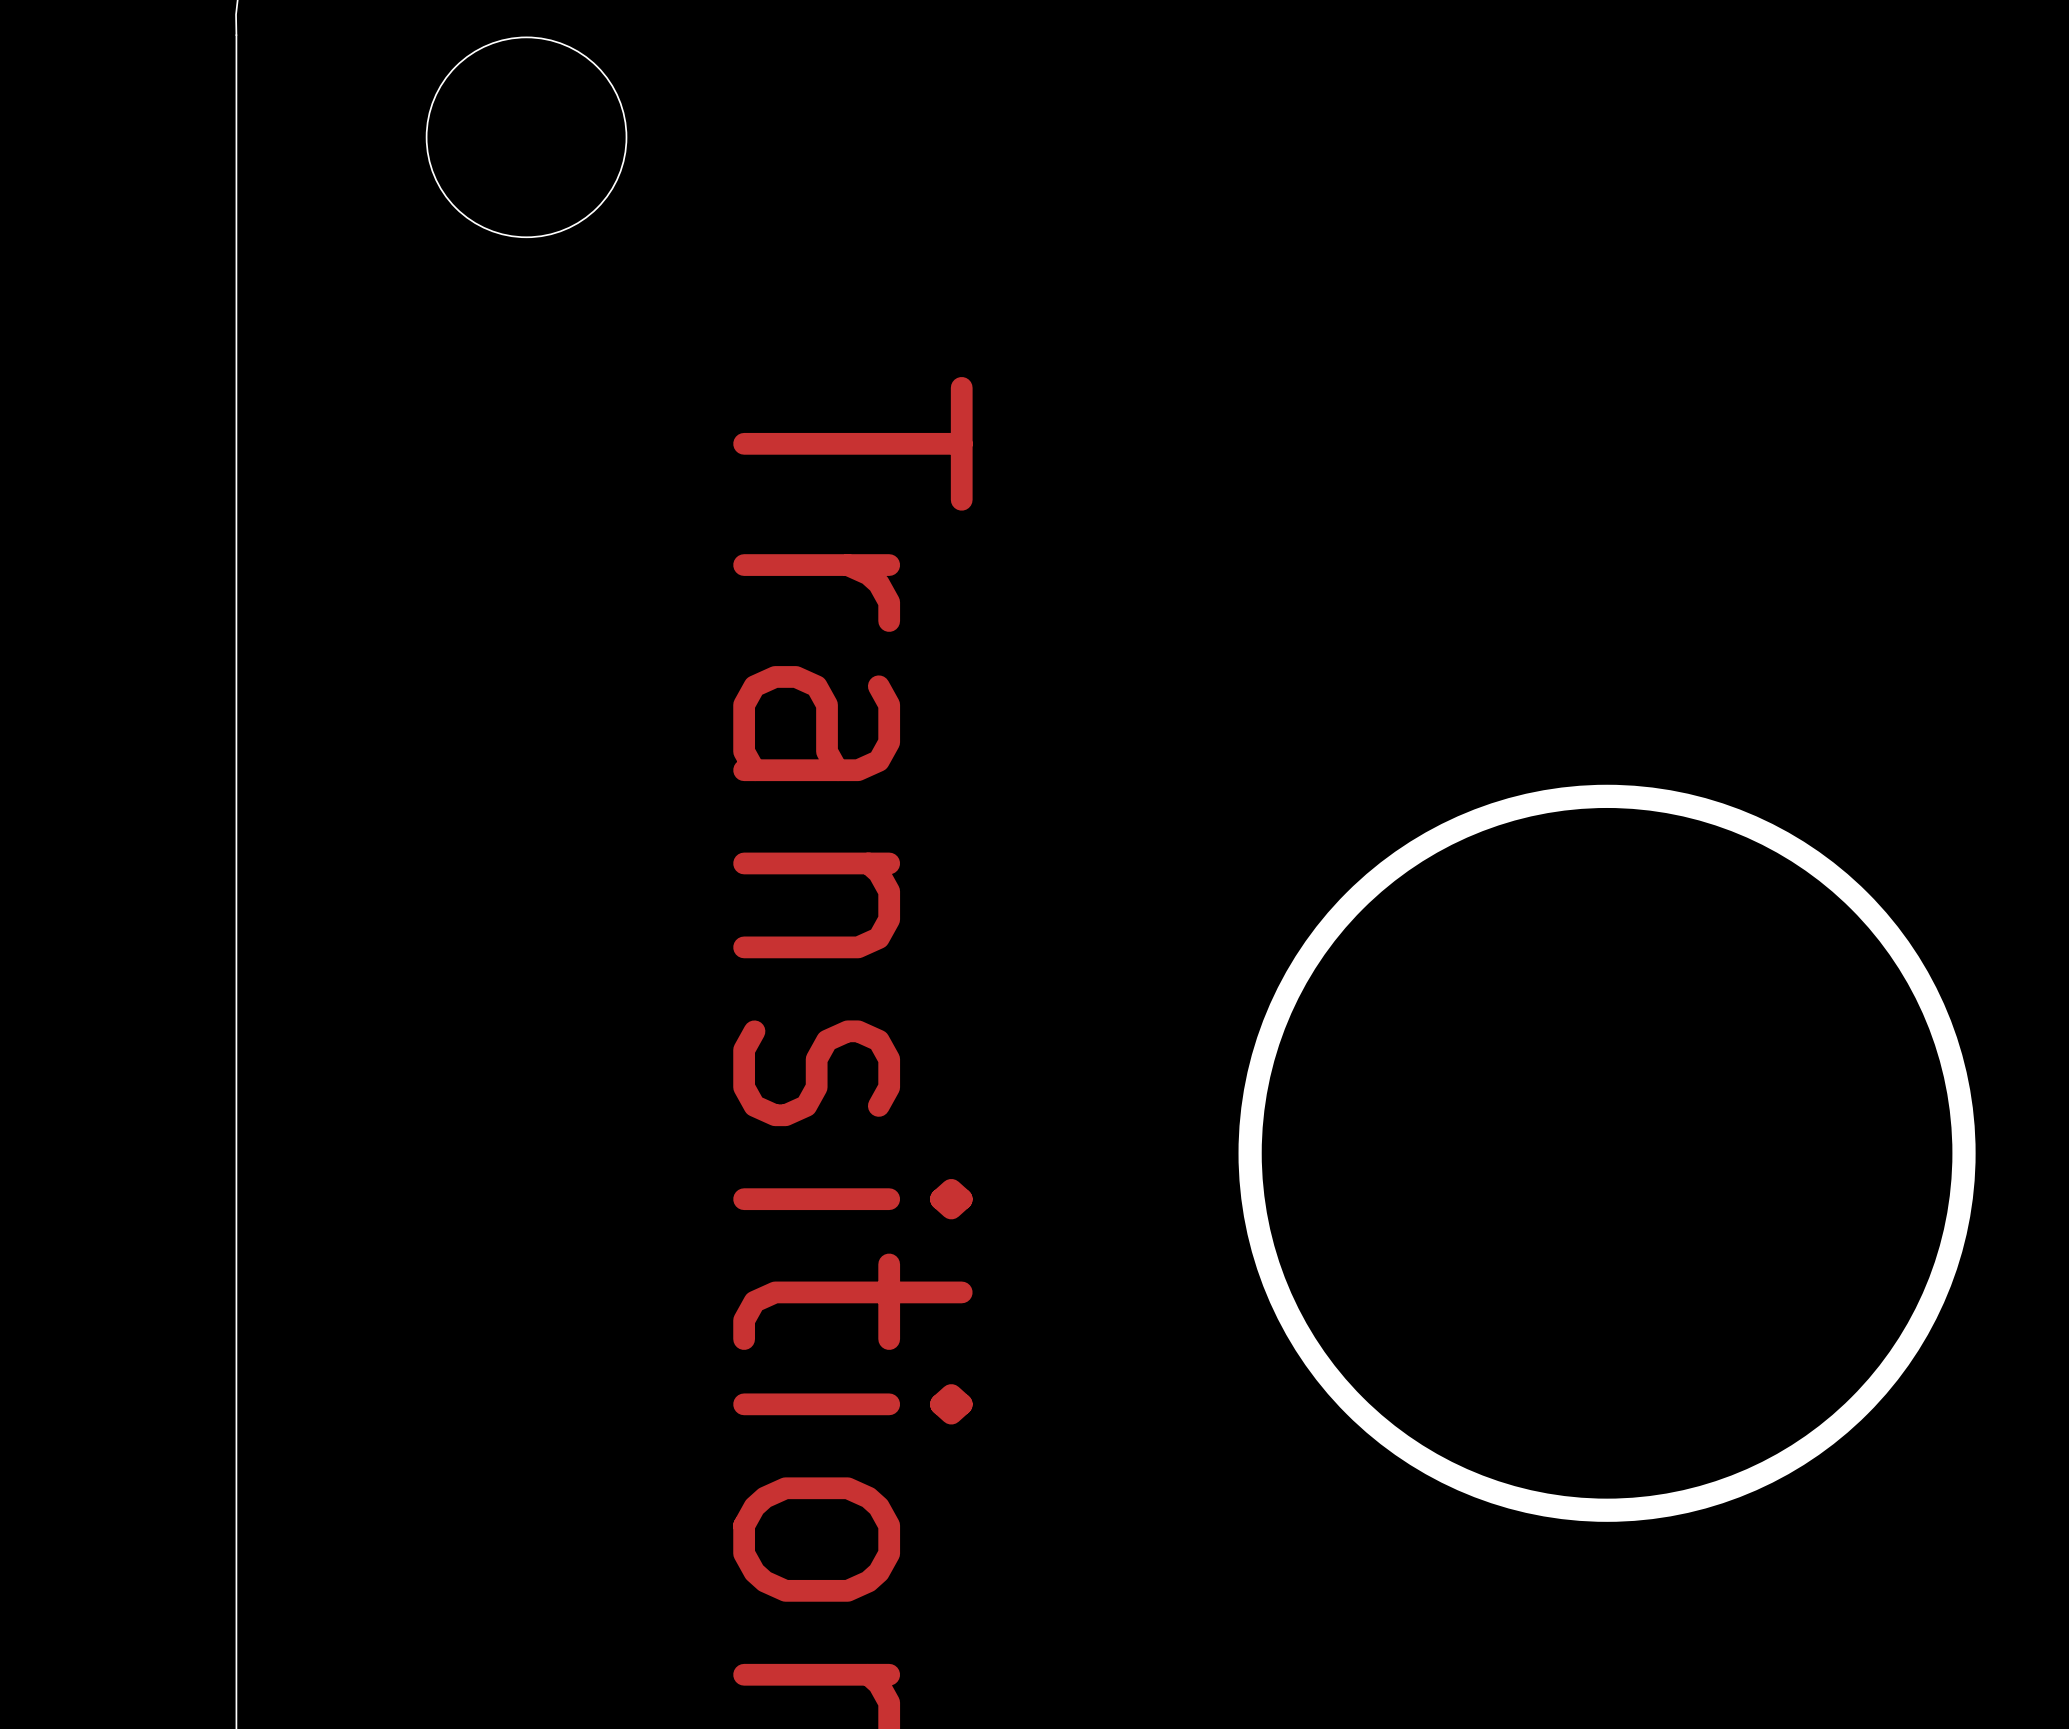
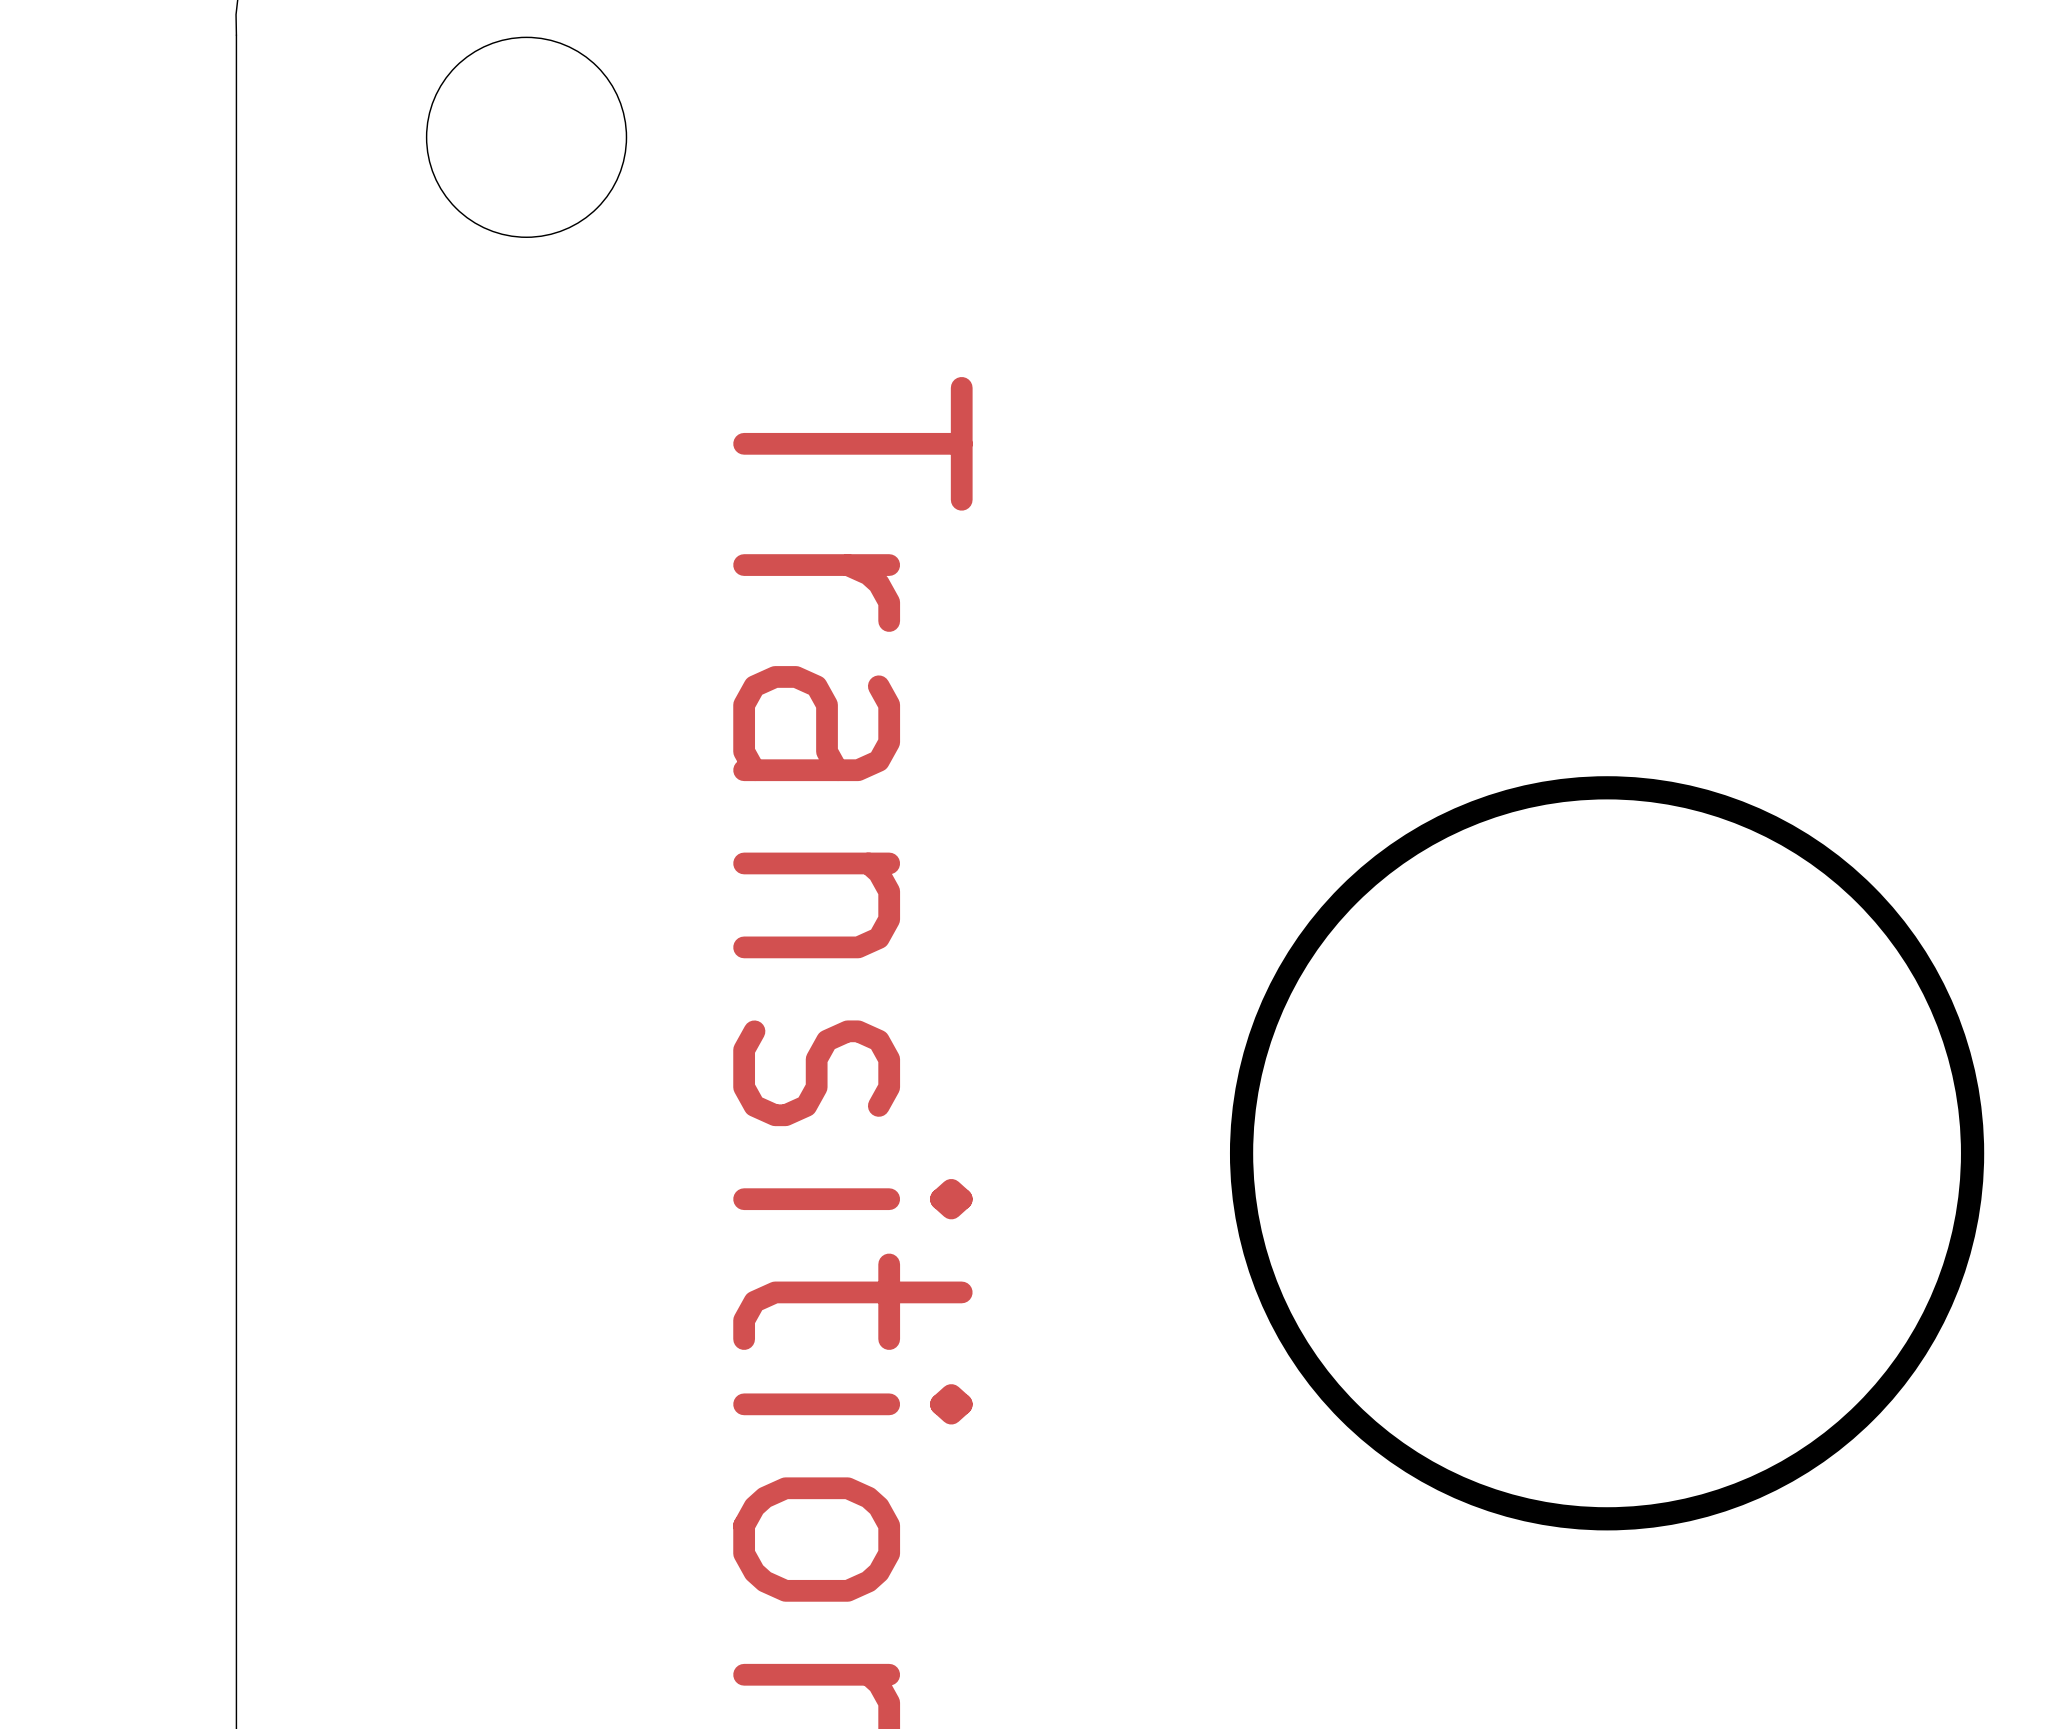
round board edge size: [1238, 784, 1976, 1522] -> [1229, 776, 1985, 1531]

